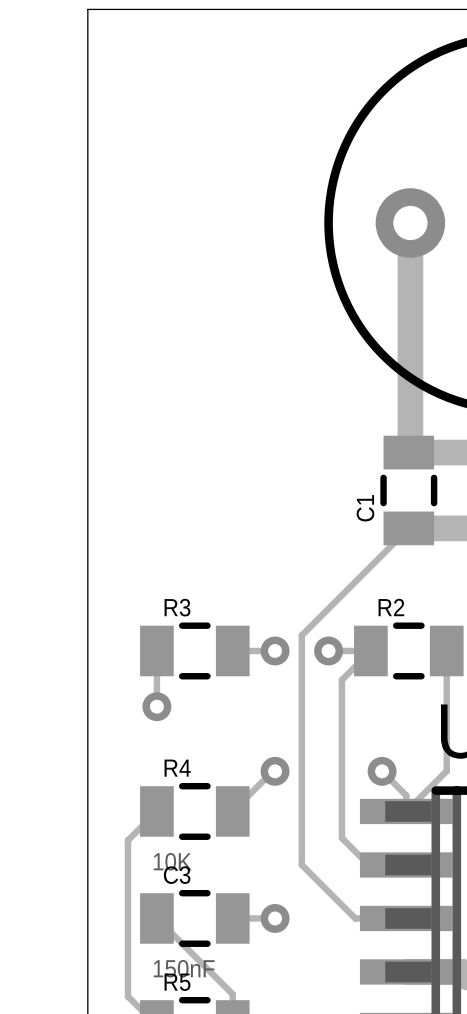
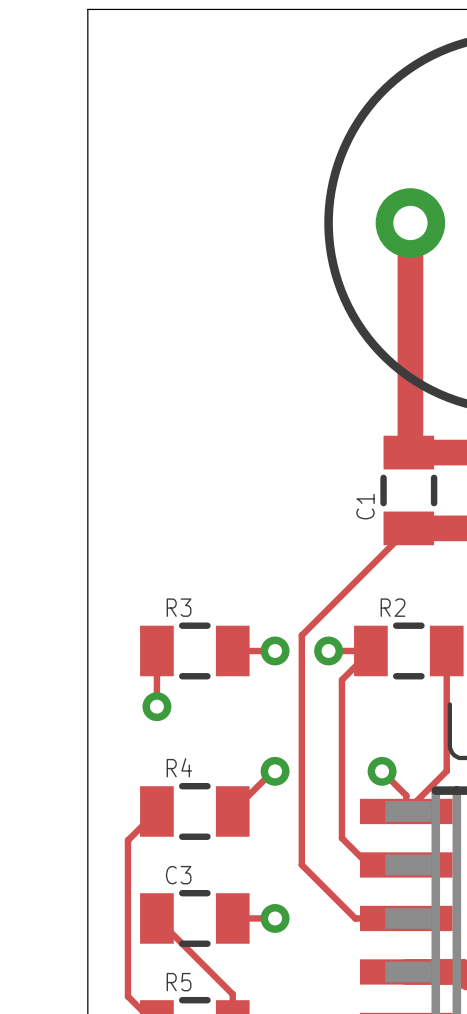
R4 value: 10K (172, 861) -> none
C3 value: 150nF (184, 968) -> none

